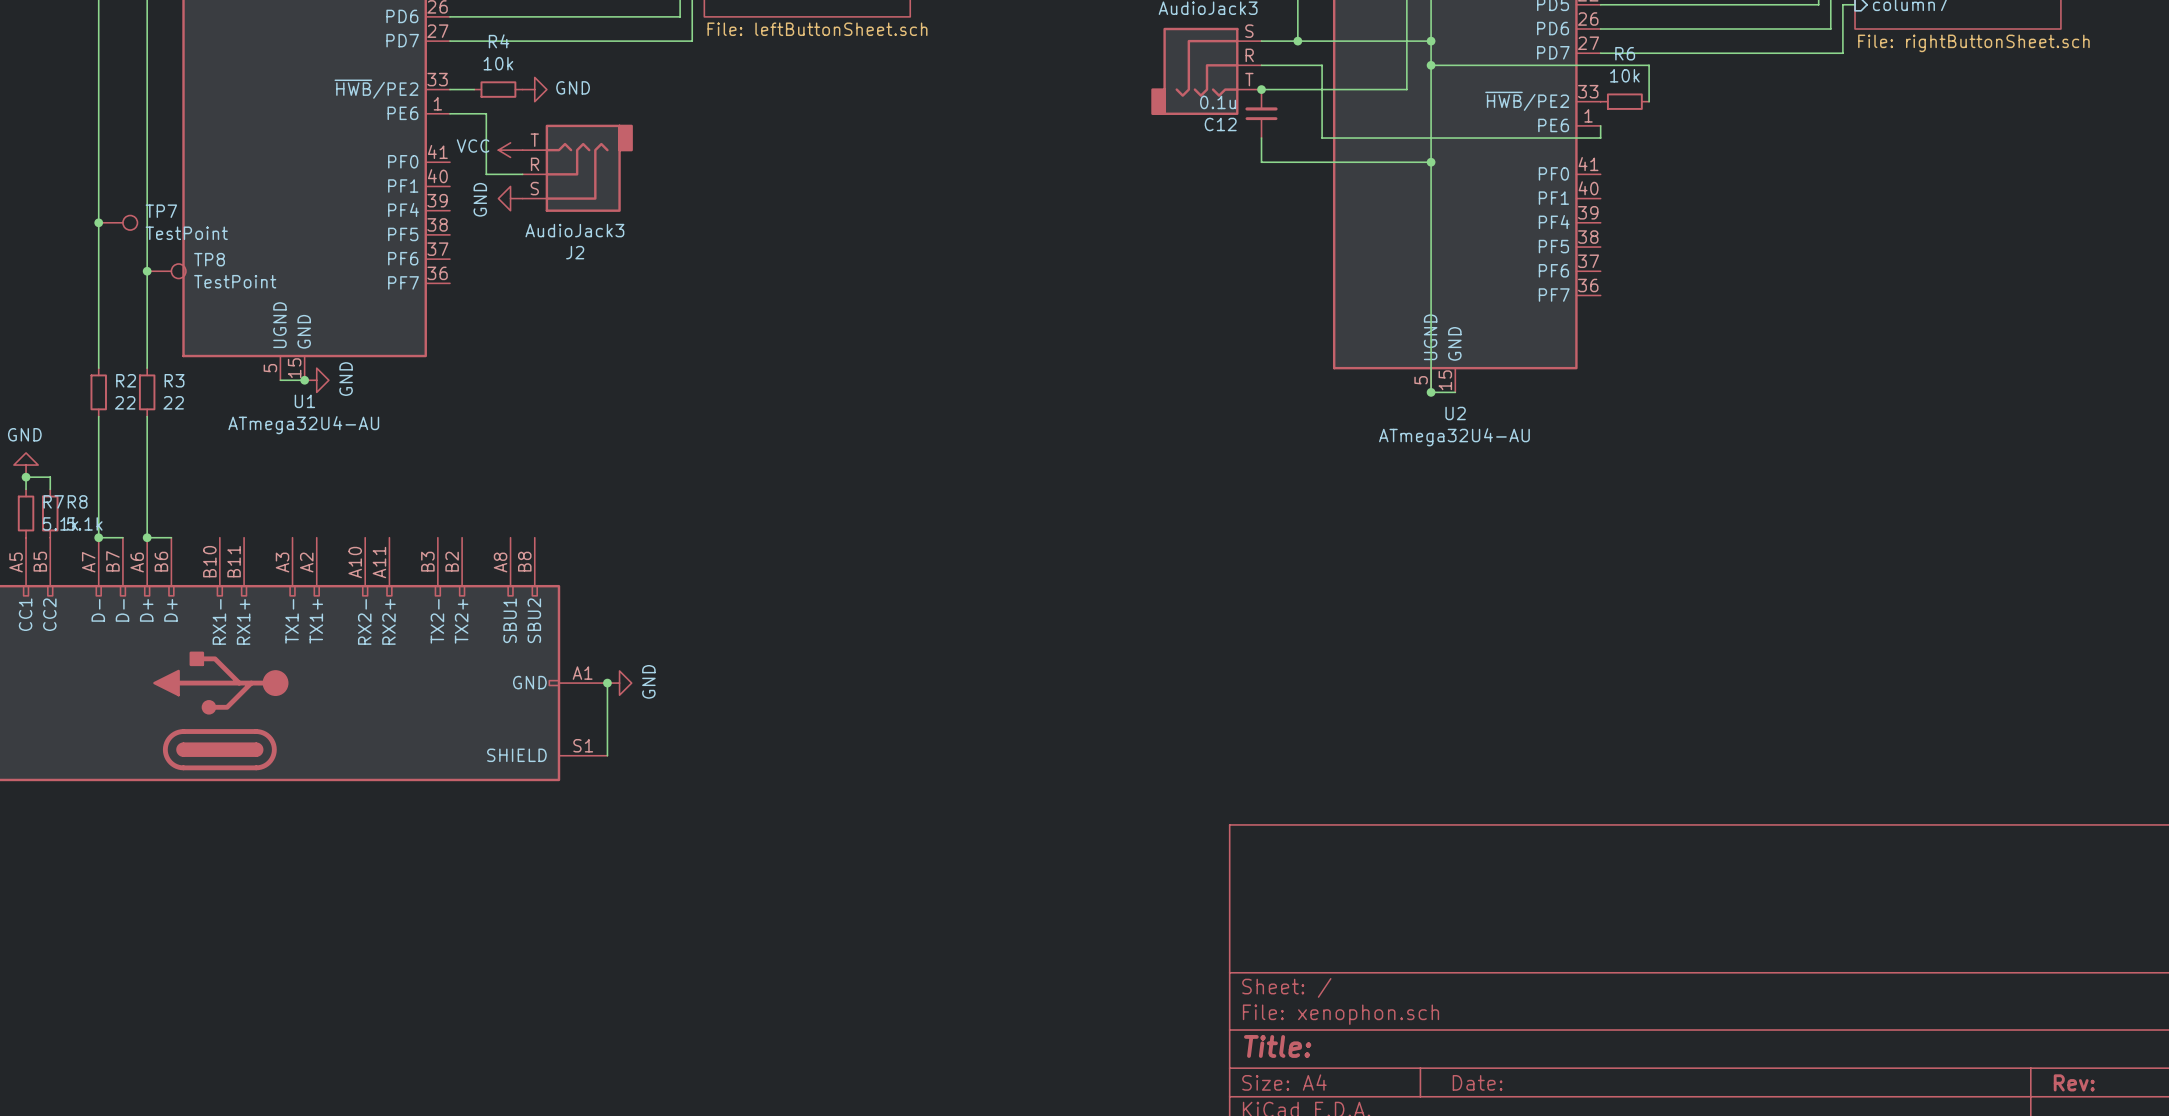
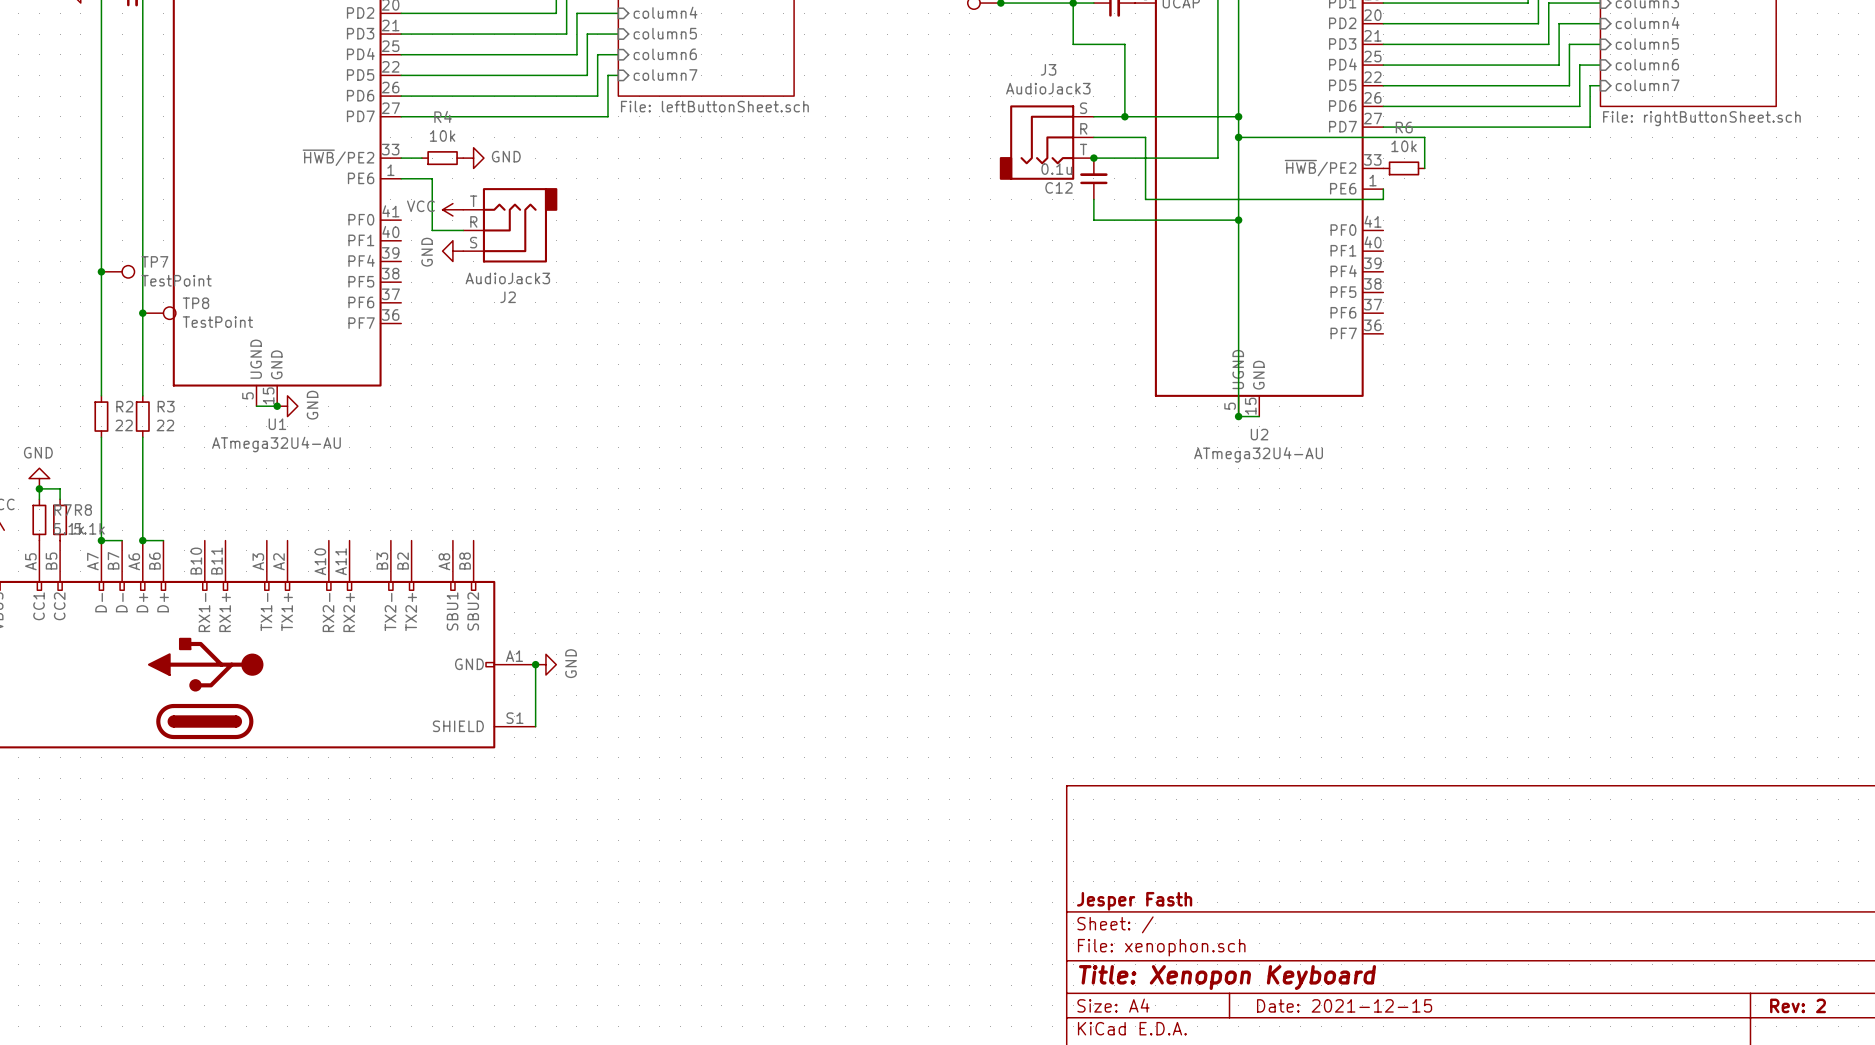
title block: none -> Jesper Fasth (1134, 901)
title block: Title: (1277, 1046) -> Title: Xenopon Keyboard (1227, 977)
title block: Date: (1477, 1082) -> Date: 2021-12-15 (1344, 1005)
title block: Rev: (2074, 1082) -> Rev: 2 (1798, 1005)

